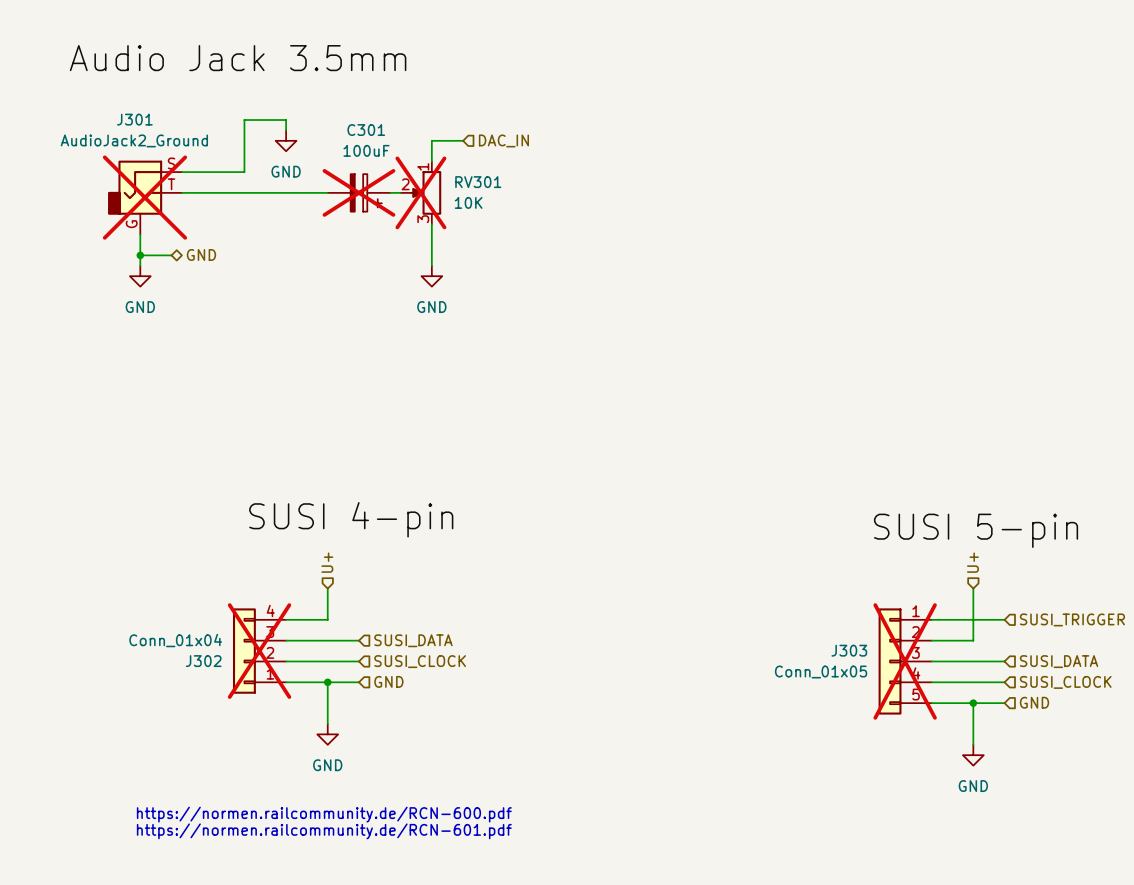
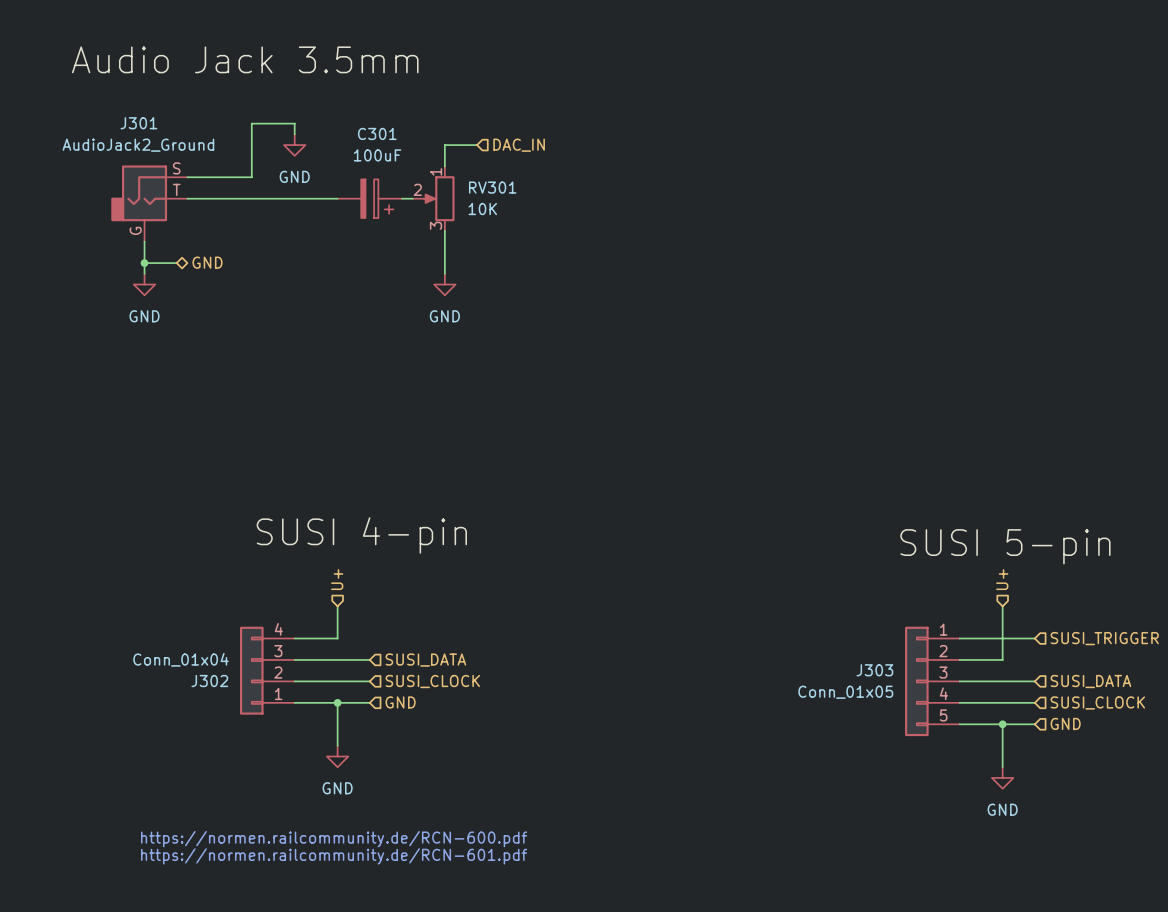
C301 do-not-place cross: (358, 192) -> none
RV301 do-not-place cross: (420, 192) -> none
J301 do-not-place cross: (144, 197) -> none
J302 do-not-place cross: (259, 651) -> none
J303 do-not-place cross: (905, 661) -> none

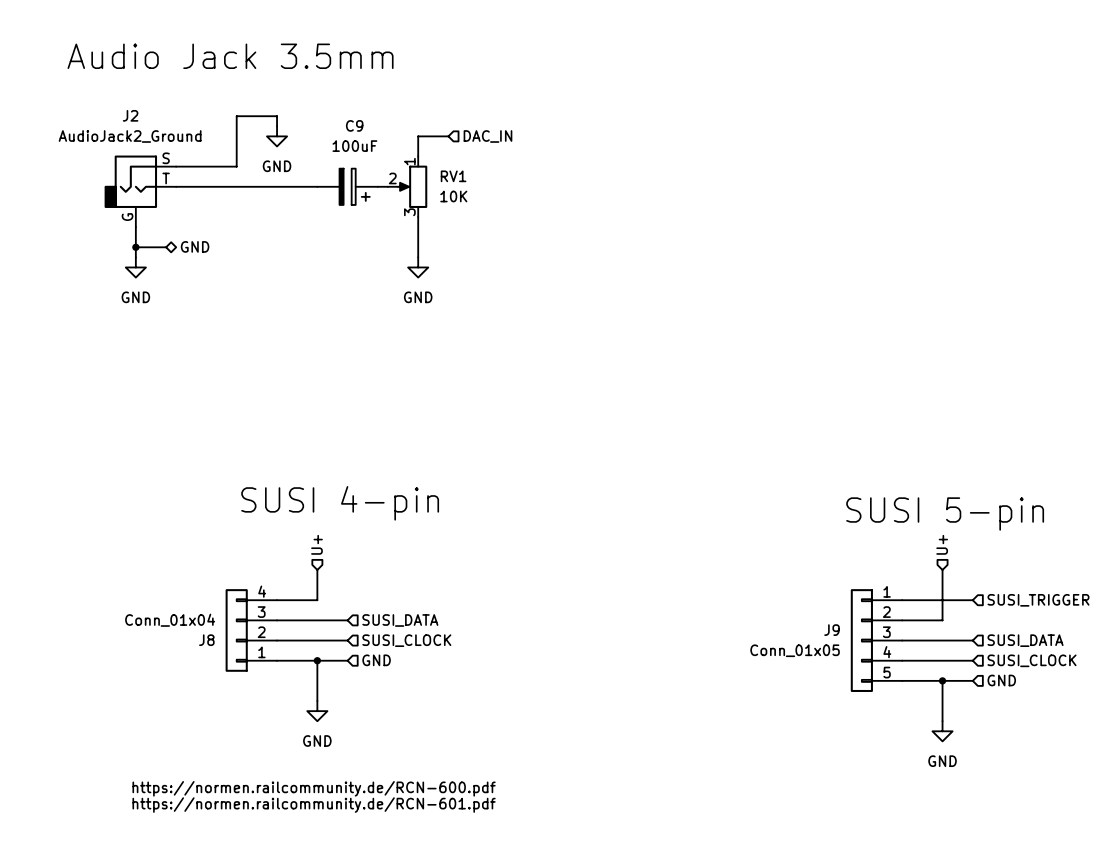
J301 name: J301 (138, 123) -> J2 (130, 115)
C301 name: C301 (377, 133) -> C9 (354, 125)
RV301 name: RV301 (492, 187) -> RV1 (453, 176)
J303 name: J303 (874, 670) -> J9 (832, 630)
J302 name: J302 (209, 681) -> J8 (206, 640)

